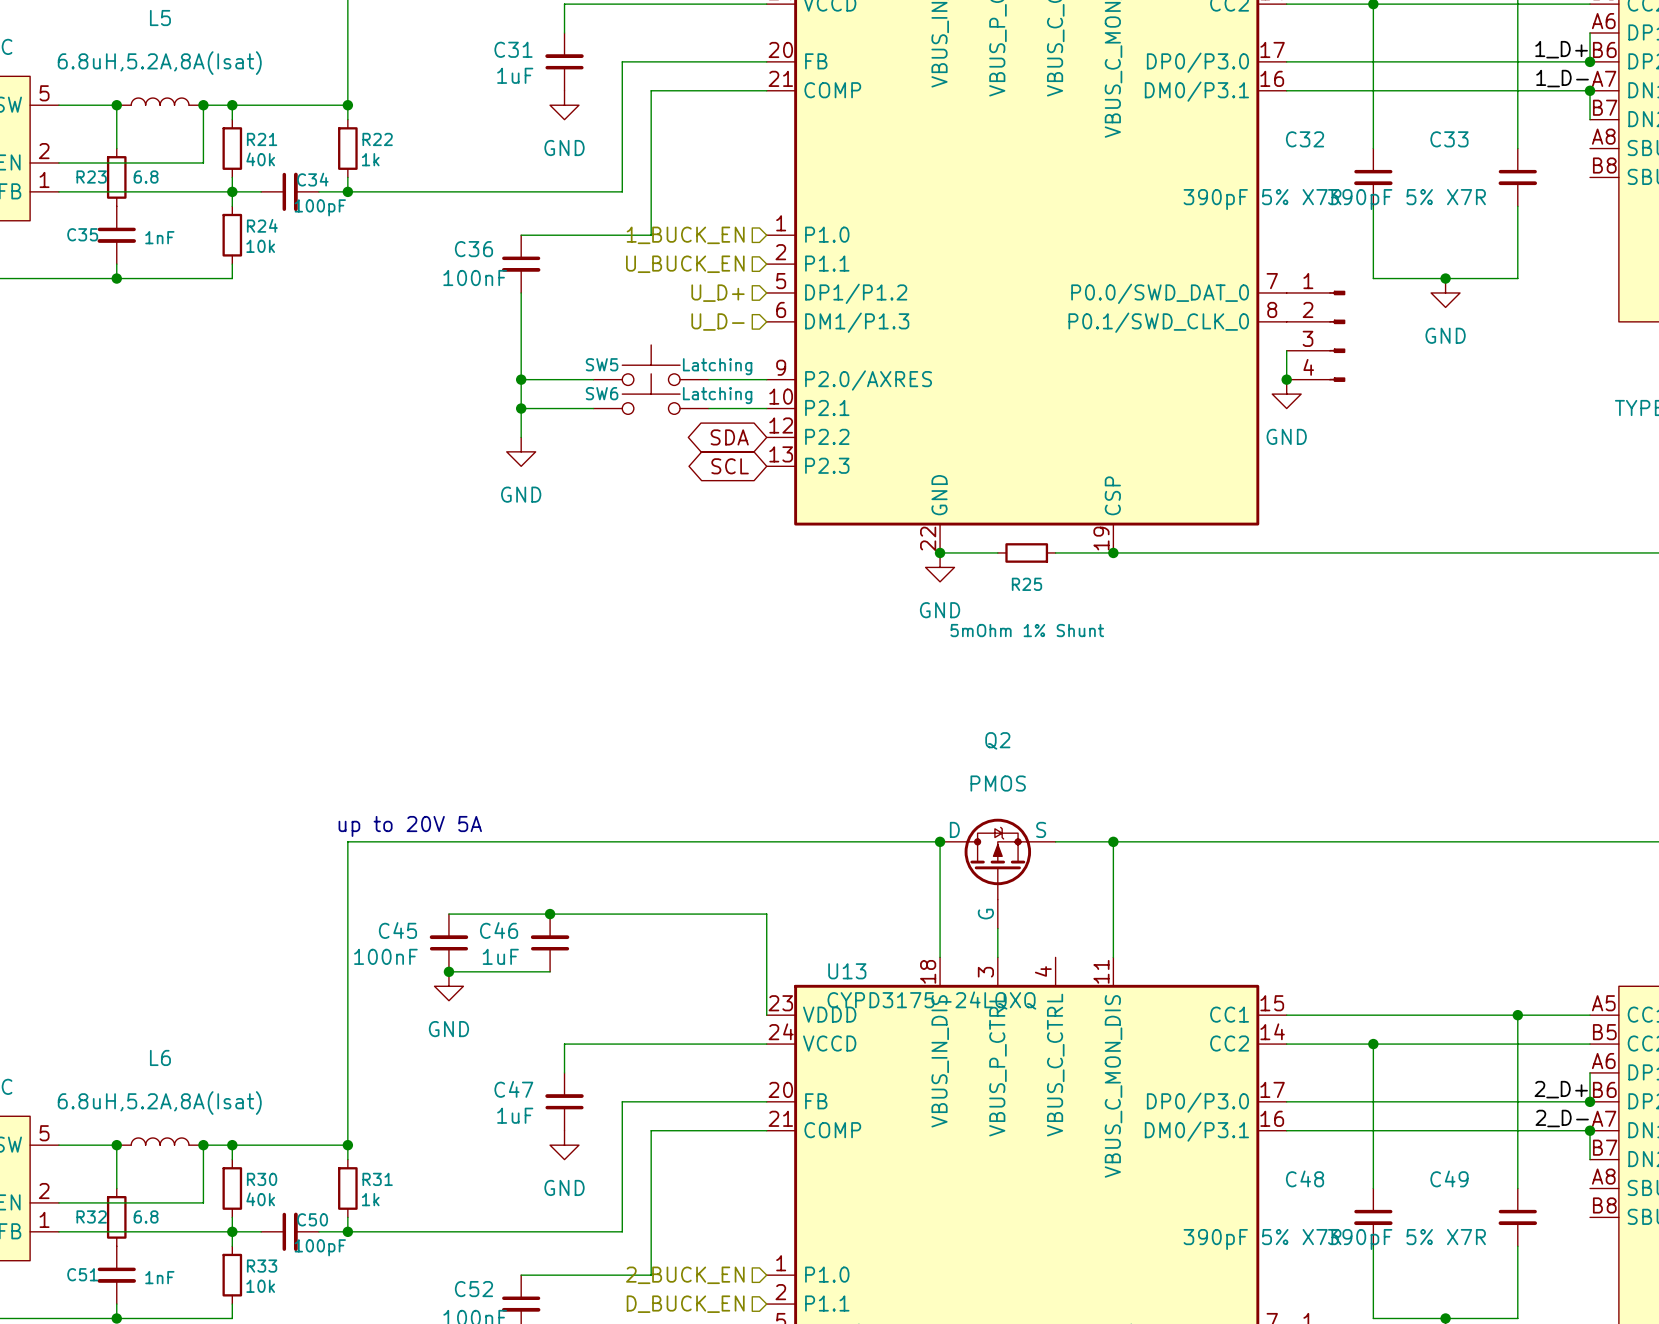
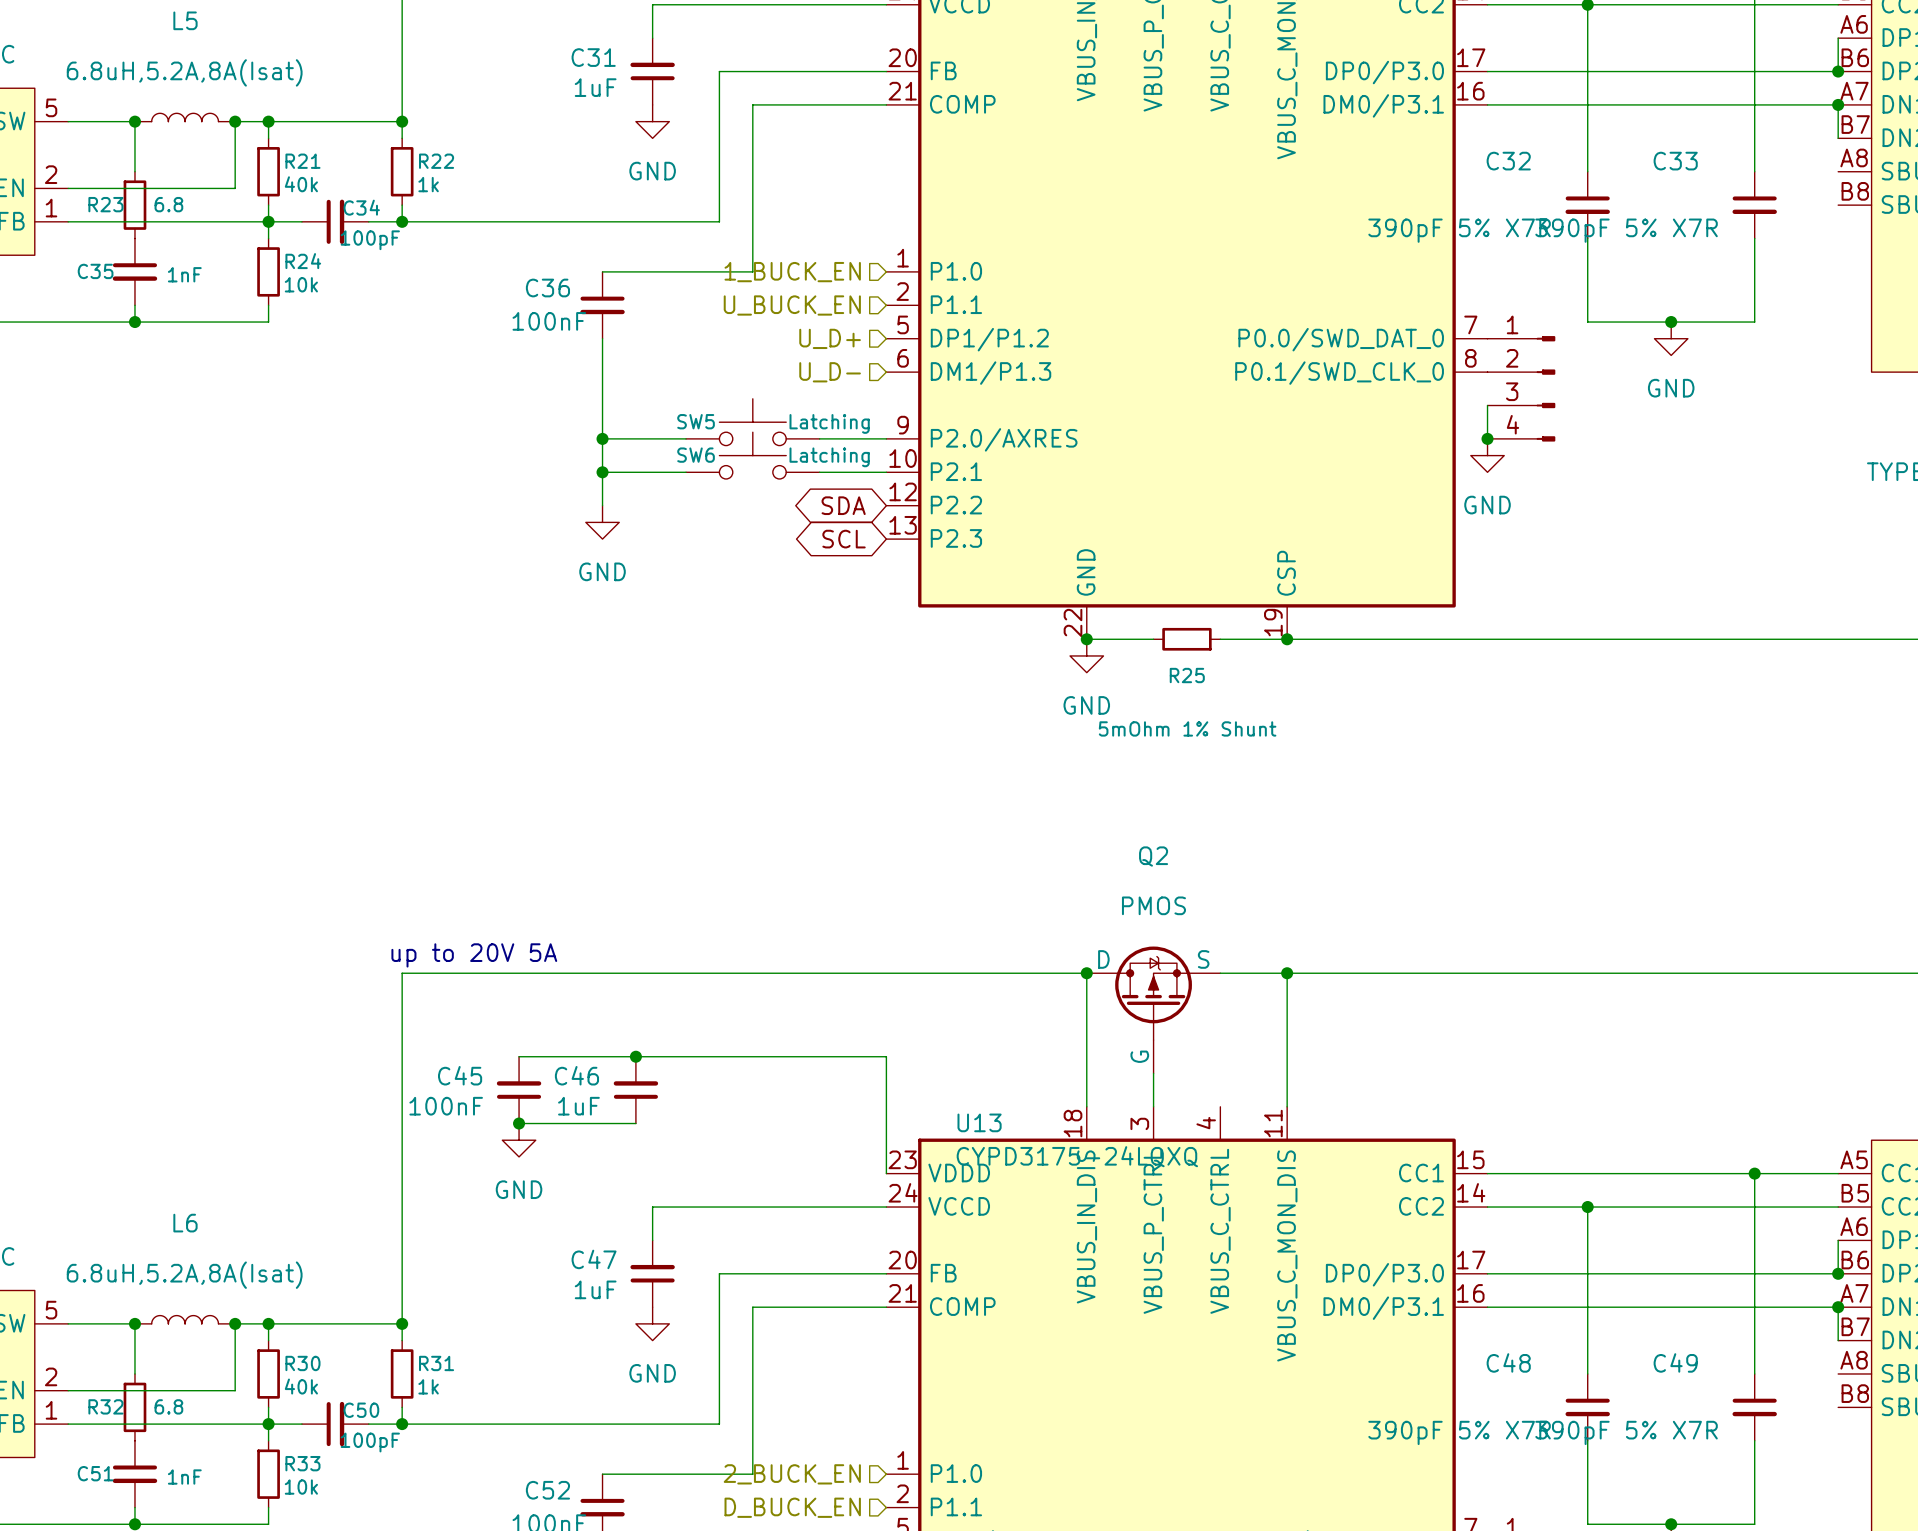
label: 1_D+ (1561, 49) -> none
label: 1_D- (1562, 78) -> none
label: 2_D+ (1561, 1089) -> none
label: 2_D- (1562, 1118) -> none

